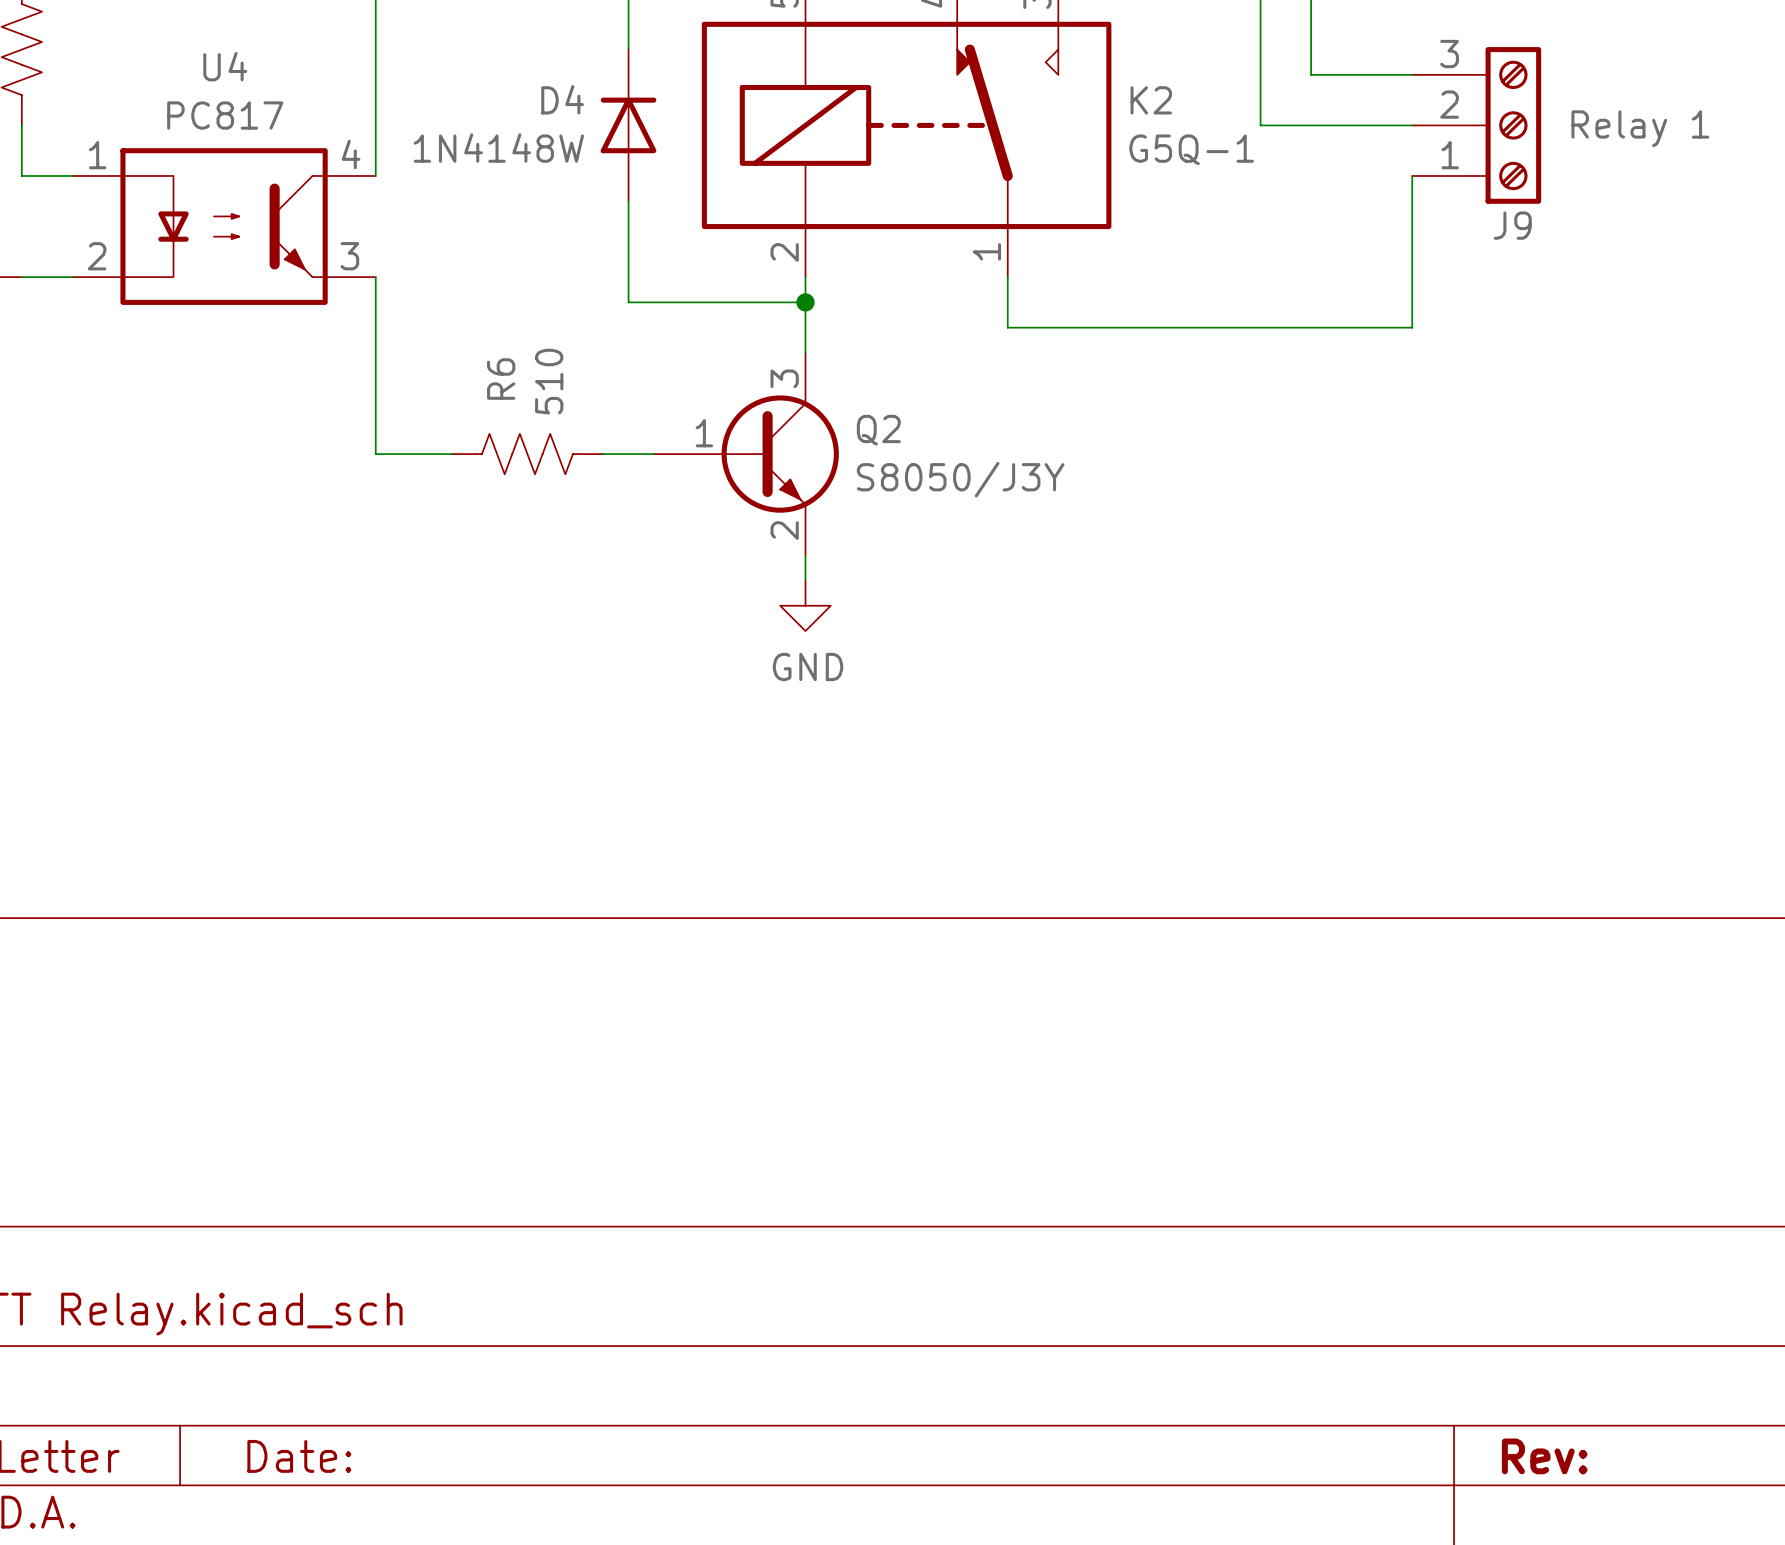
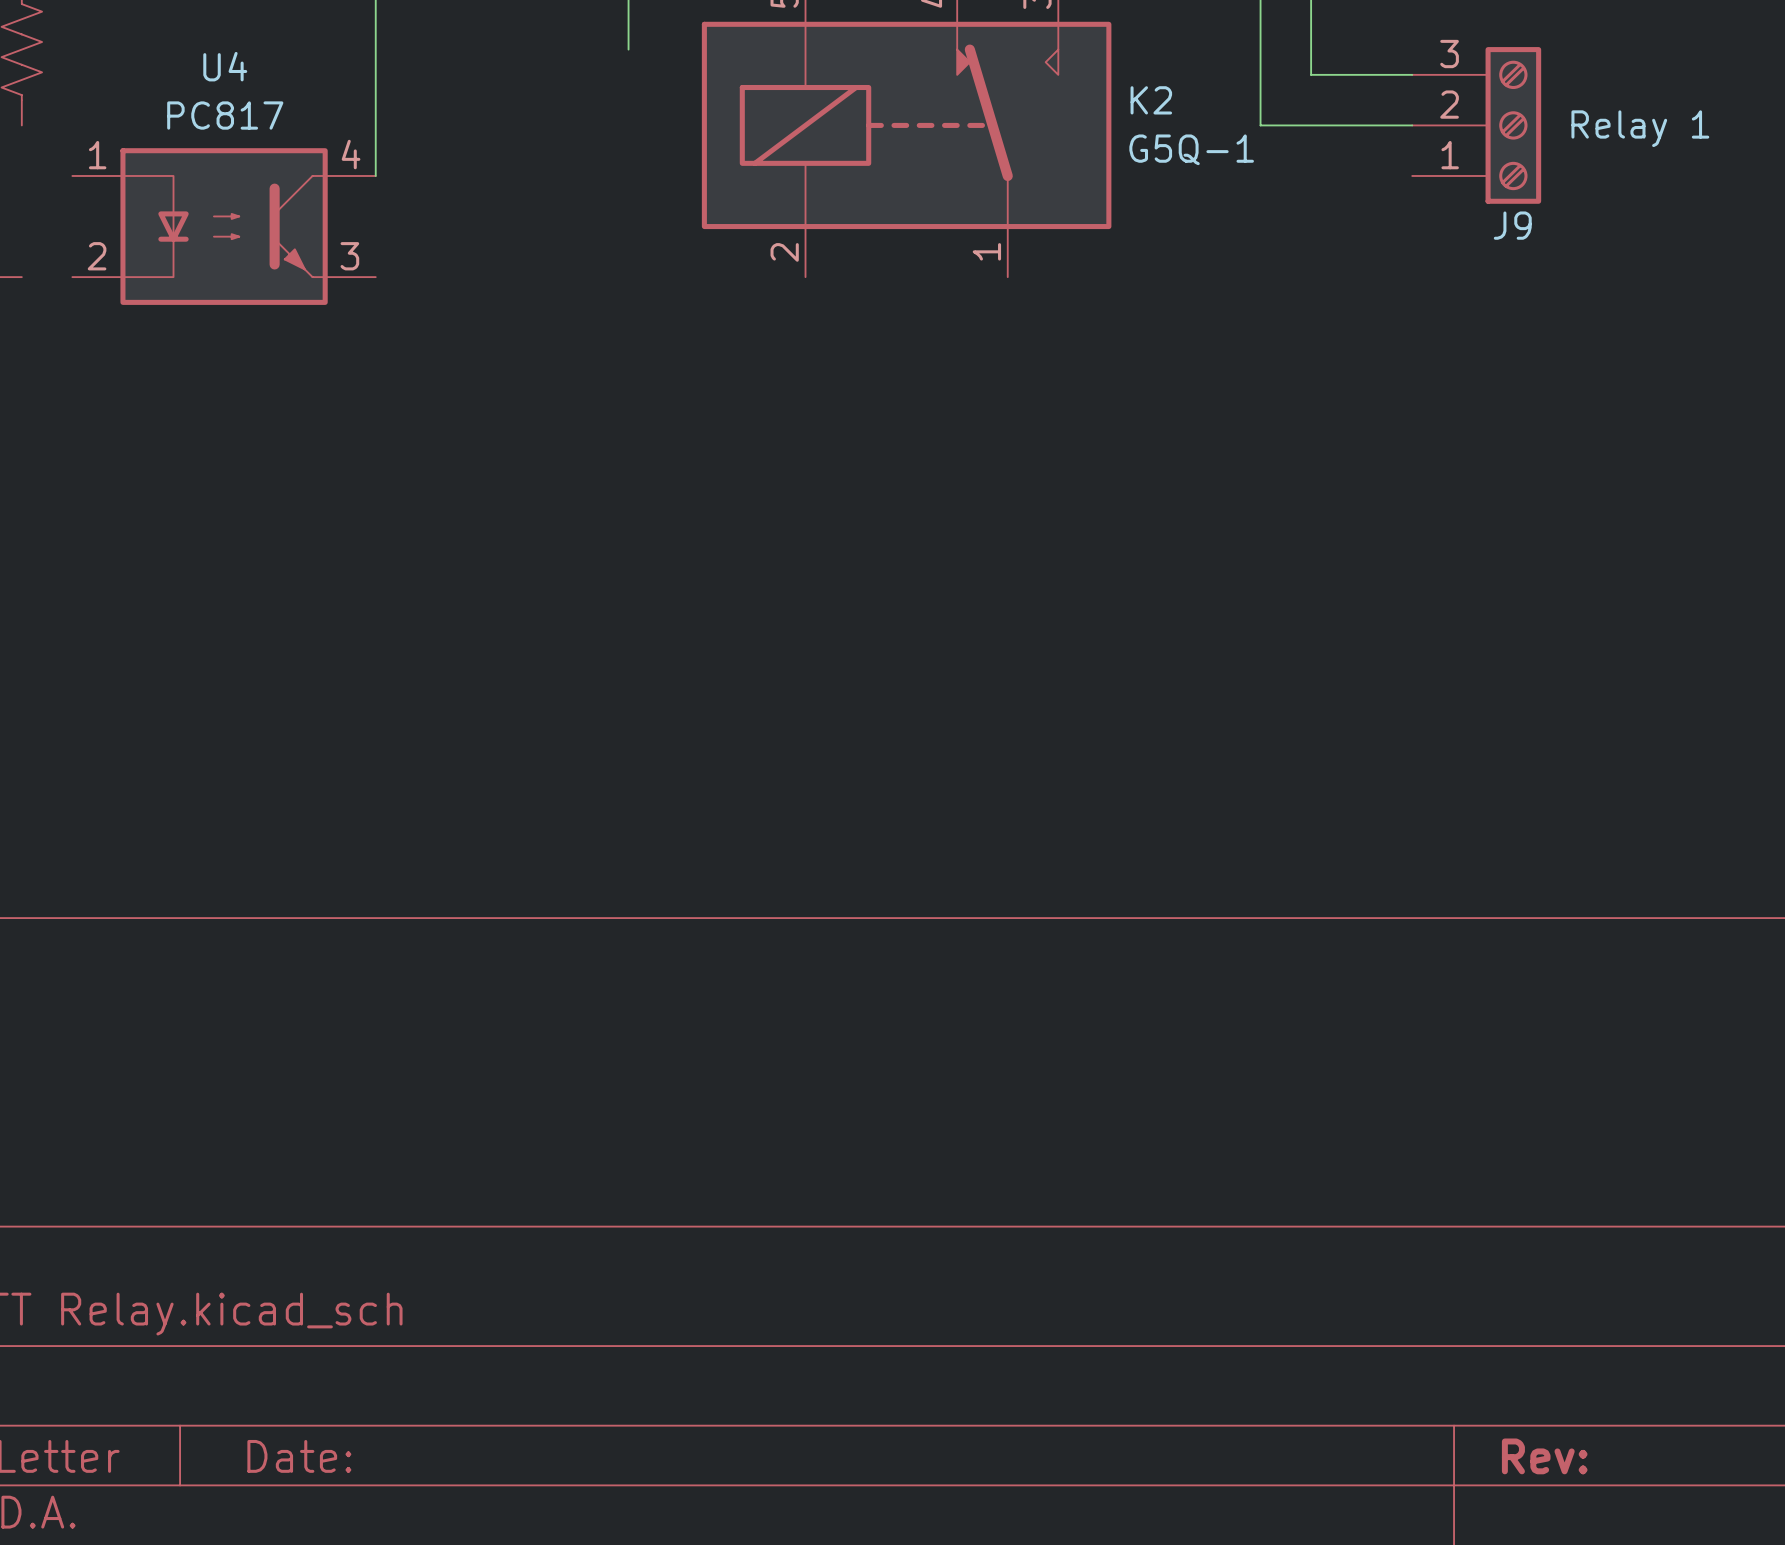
wire: (21, 125) (21, 175) (72, 175) -> none
D4: 1N4148W (628, 125) -> none
wire: (1412, 175) (1412, 327) (1007, 327) (1007, 277) -> none
wire: (628, 201) (628, 302) (805, 302) -> none
wire: (21, 277) (72, 277) -> none
wire: (375, 277) (375, 454) (451, 454) -> none
wire: (805, 277) (805, 352) -> none
junction: (805, 302) -> none
R6: 510 (527, 454) -> none
wire: (603, 454) (653, 454) -> none
Q2: S8050/J3Y (746, 454) -> none
wire: (805, 555) (805, 580) -> none
power symbol: GND (805, 605) -> none

